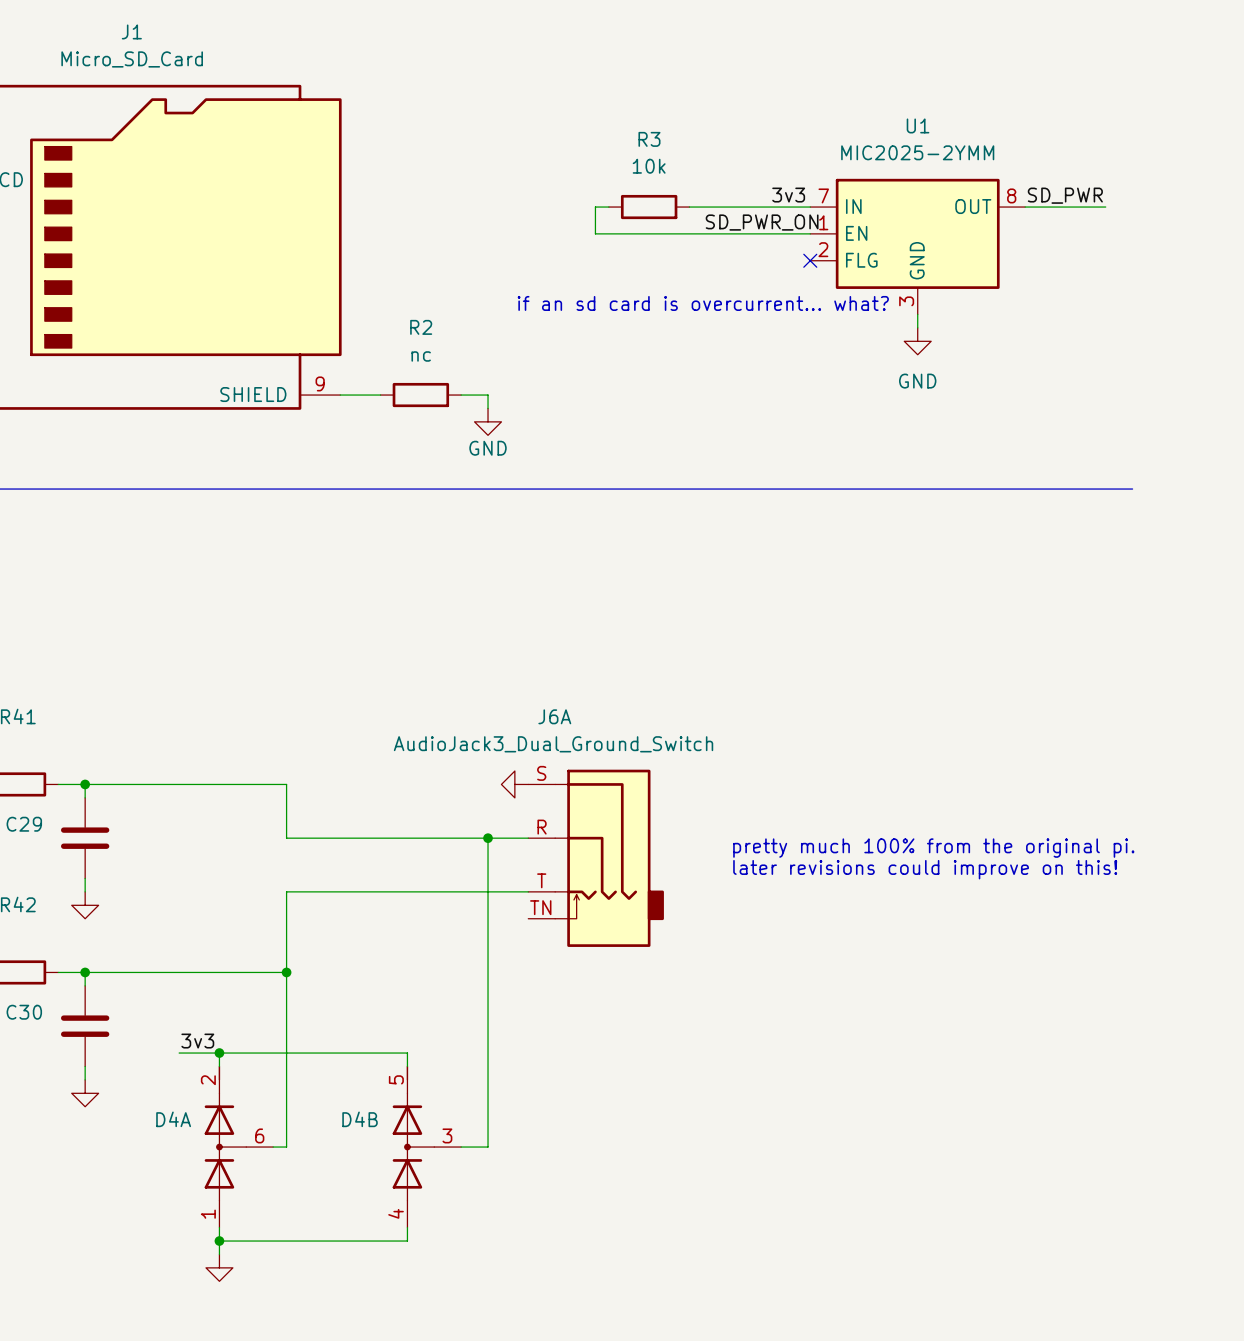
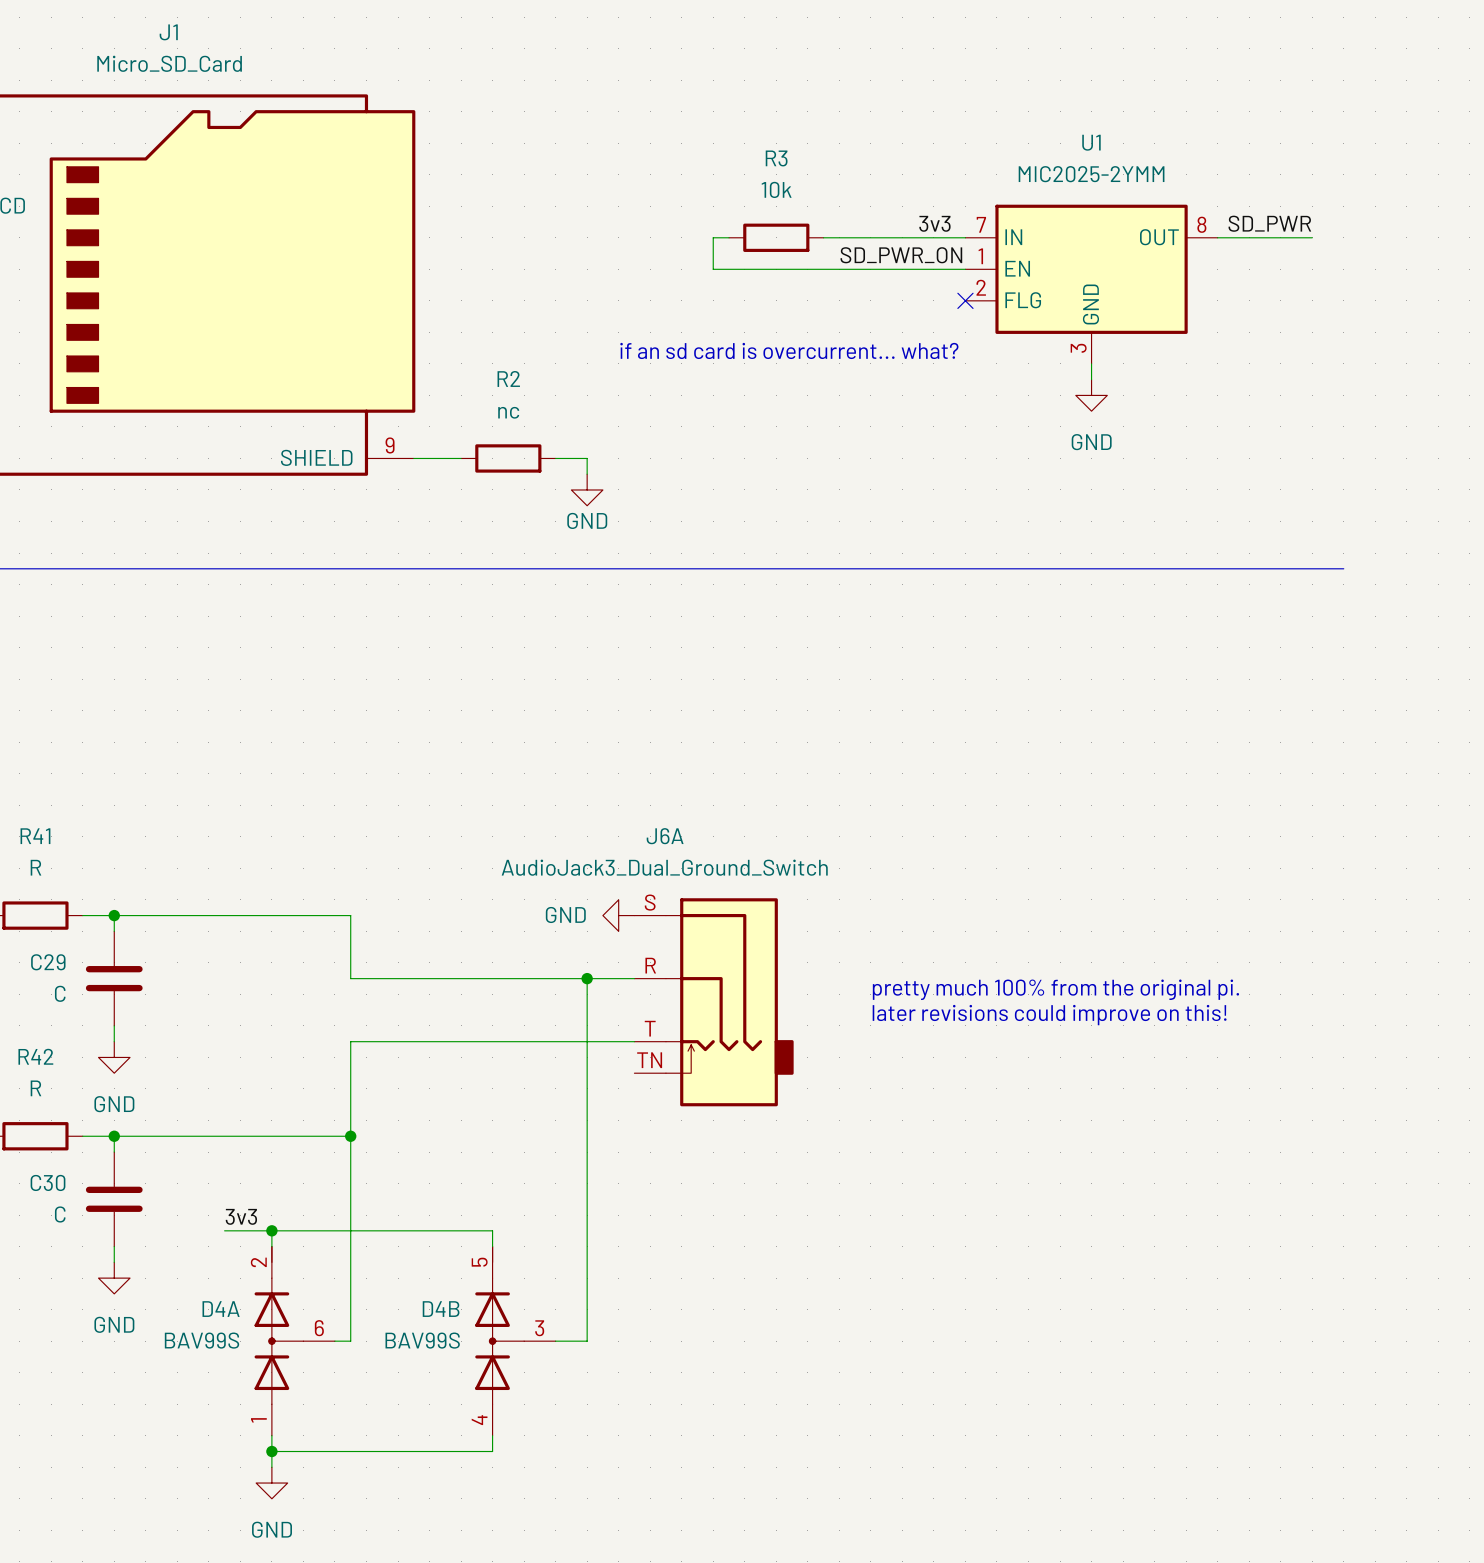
R41 value: none -> R (35, 867)
power symbol text: none -> GND (565, 914)
C29 value: none -> C (60, 993)
R42 value: none -> R (35, 1088)
power symbol text: none -> GND (114, 1104)
C30 value: none -> C (60, 1214)
power symbol text: none -> GND (114, 1324)
D4A value: none -> BAV99S (201, 1340)
D4B value: none -> BAV99S (422, 1340)
power symbol text: none -> GND (272, 1529)

